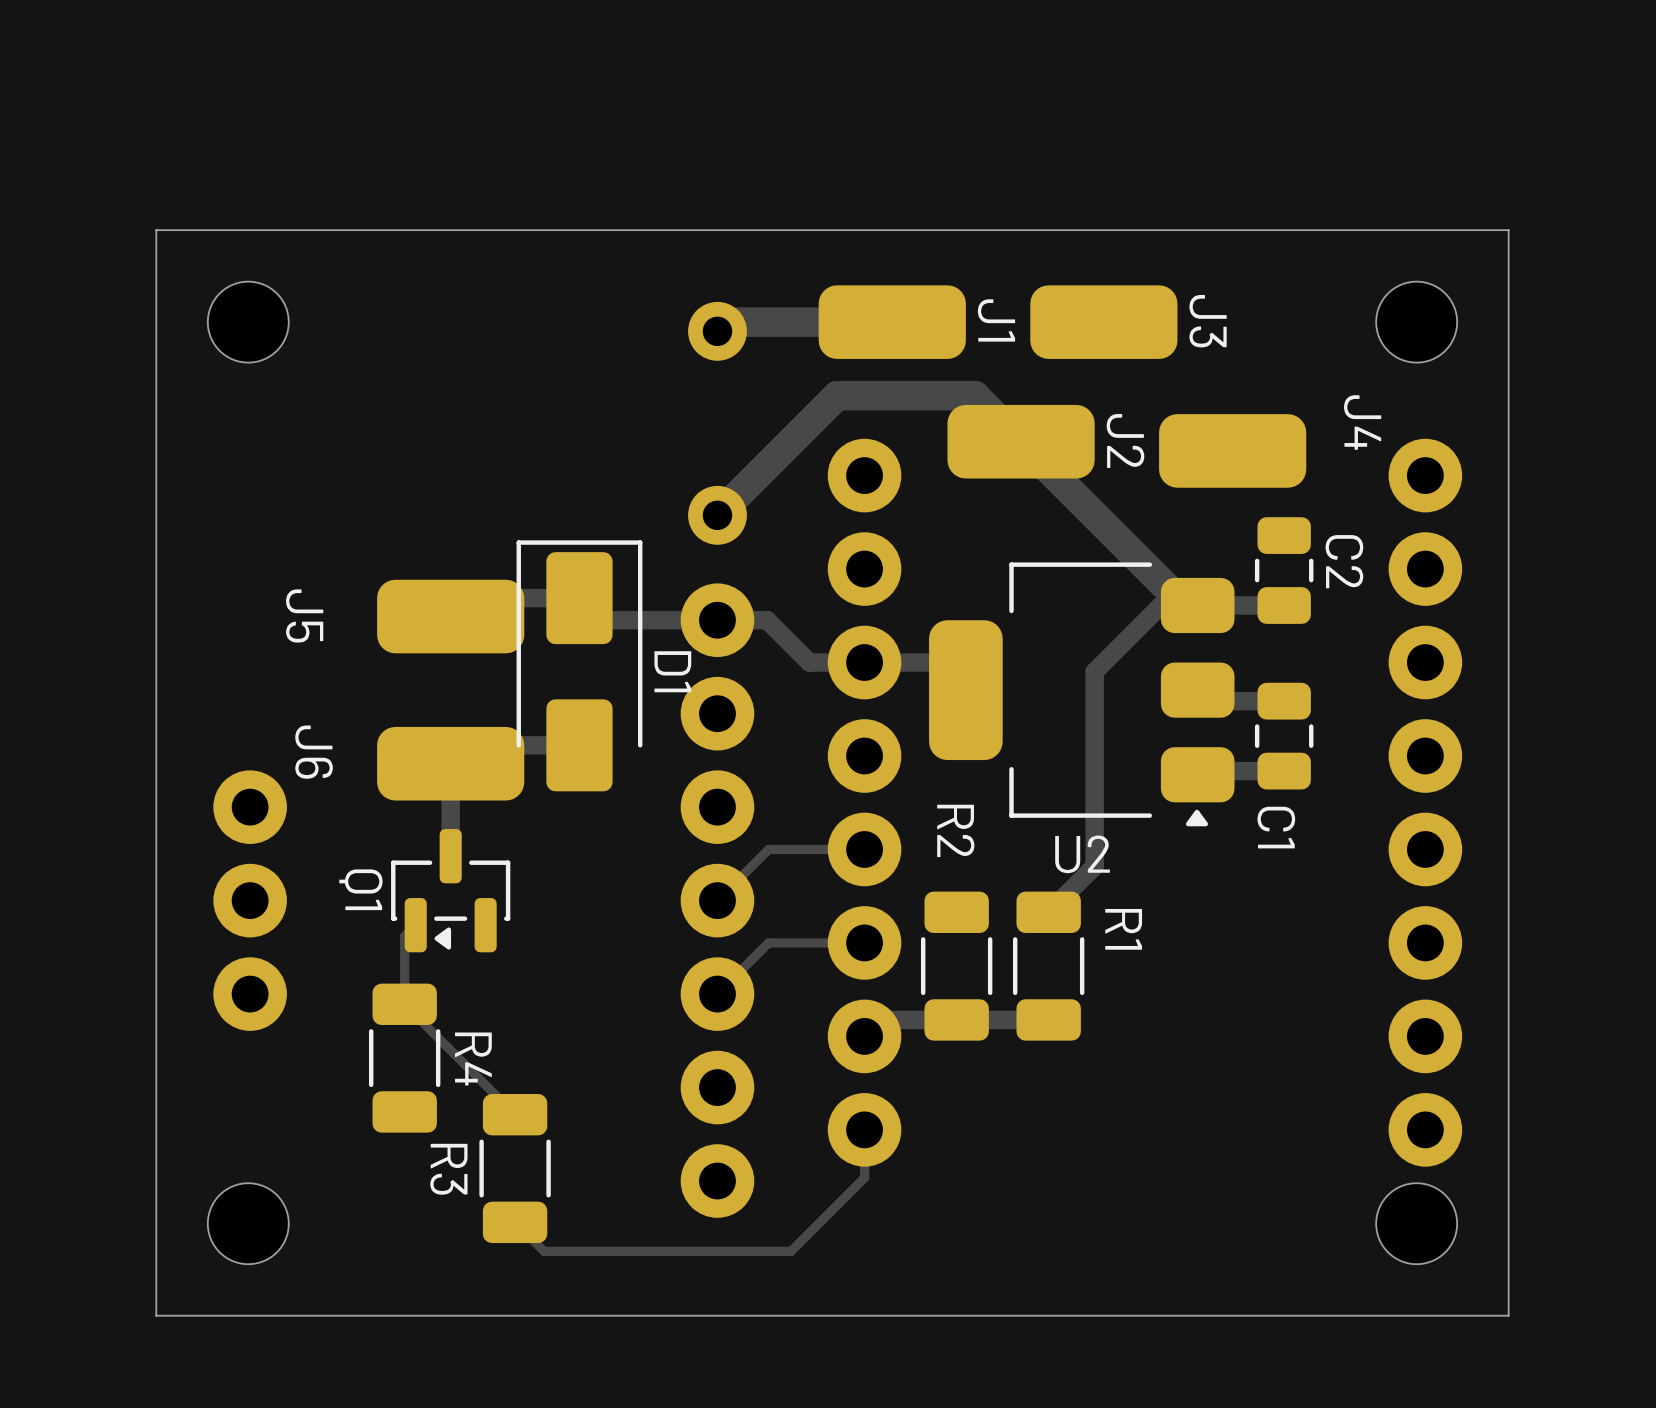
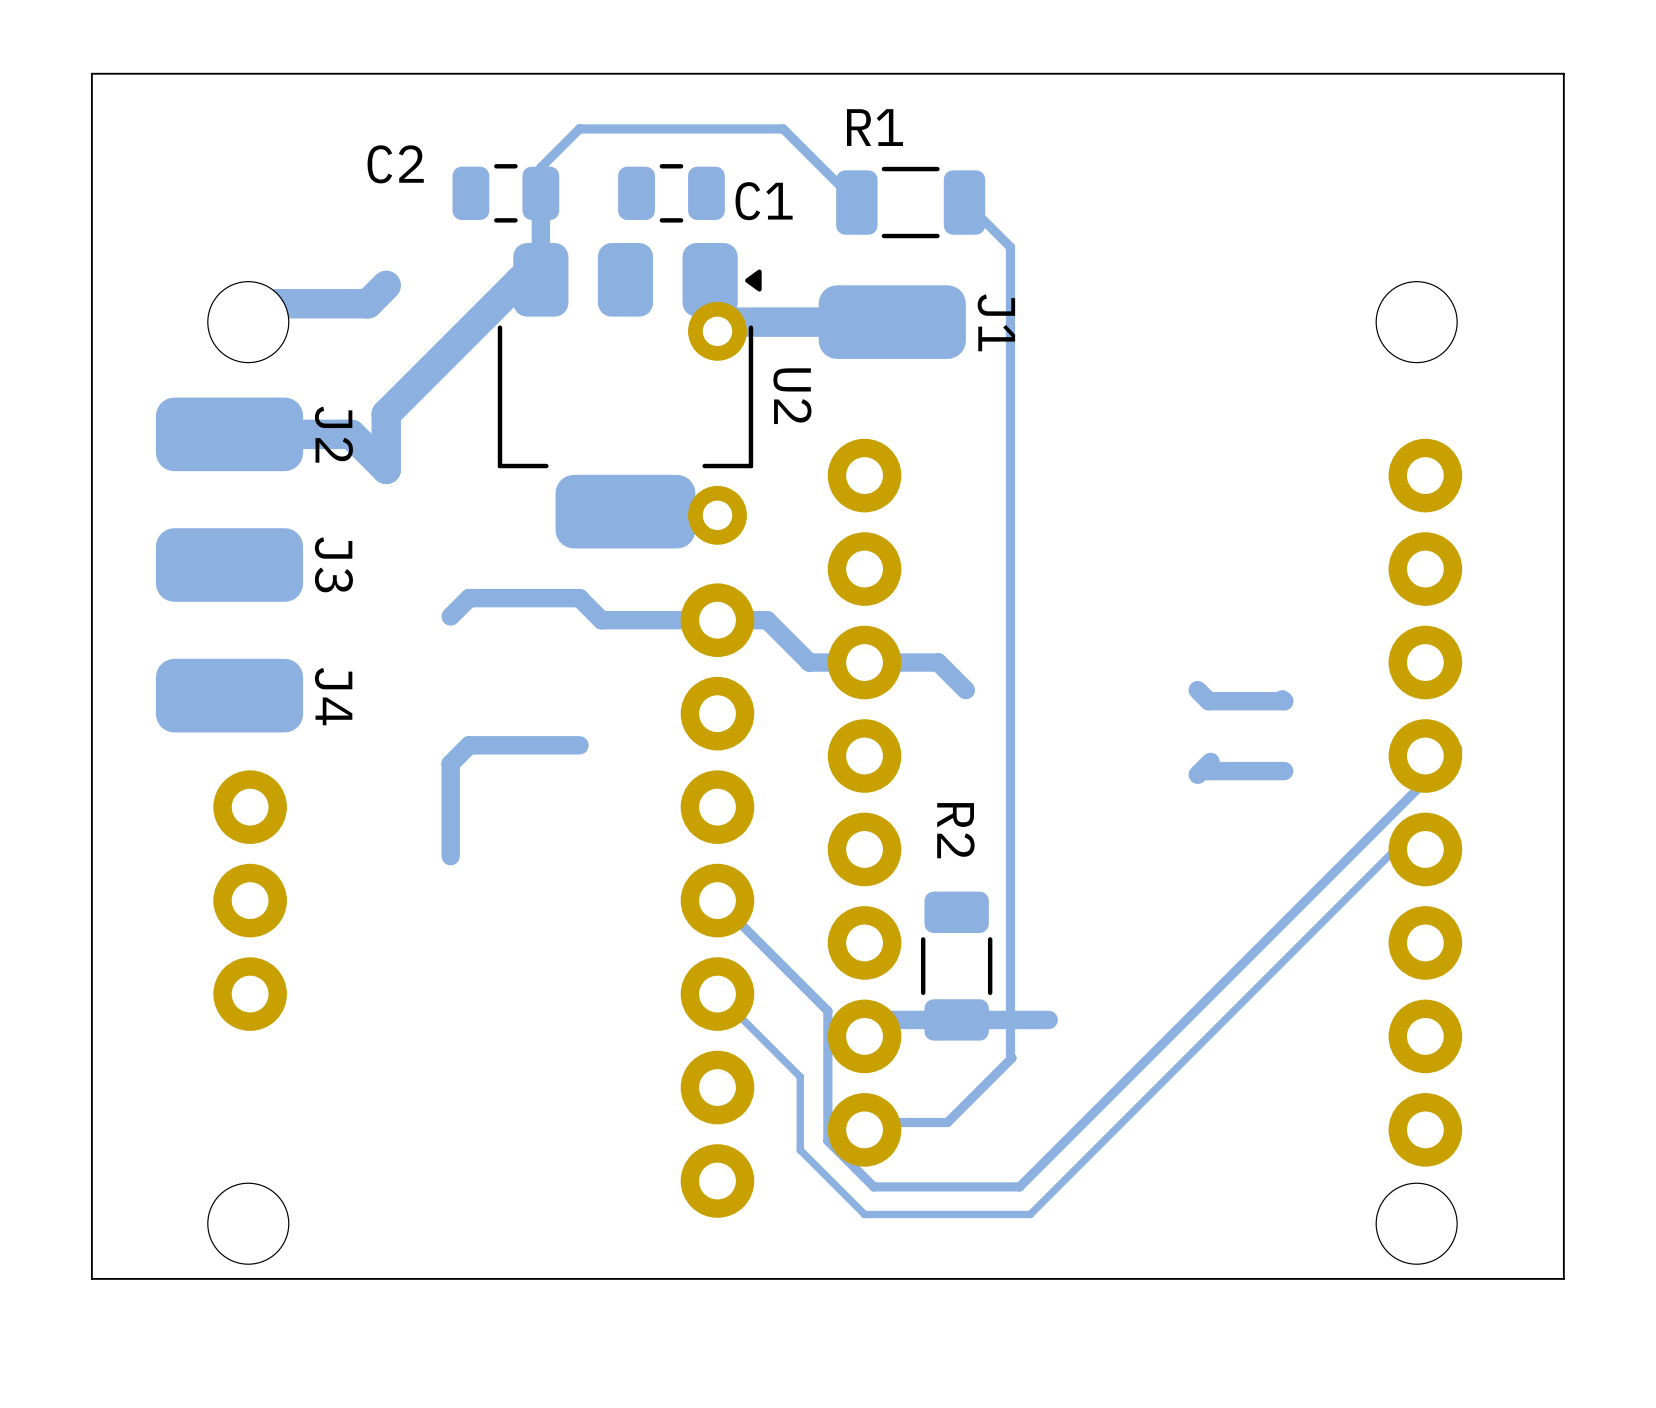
track: none -> (856, 202) (783, 128) (579, 128) (540, 167) (540, 279) (520, 279) (386, 414) (386, 469) (351, 434) (229, 434)
track: none -> (964, 202) (1010, 247) (1011, 1058) (947, 1122) (897, 1122)
board edge: (1508, 230) (156, 230) (156, 1315) (1508, 1315) (1508, 230) -> (1563, 73) (1563, 1278) (91, 1278) (91, 73) (1563, 73)
track: none -> (386, 285) (367, 303) (229, 303)
J3 position: (1103, 322) -> (229, 565)
J4 name position: J4 (1362, 422) -> J4 (333, 696)
J2 position: (1021, 441) -> (229, 434)
J4 position: (1232, 450) -> (229, 695)
track: (717, 515) (837, 395) (975, 395) (1184, 605) -> none
C2 name position: C2 (1344, 561) -> C2 (395, 164)
C2 rotation: 0° (1284, 570) -> 90° clockwise (505, 193)
C2 position: (1284, 570) -> (505, 193)
track: (1284, 605) (1160, 605) (1094, 671) (1094, 866) (1048, 912) -> none
J5: (450, 616) -> none
D1: (579, 665) -> none
U2 rotation: 0° (1081, 694) -> 90° counterclockwise (629, 395)
U2 position: (1081, 694) -> (629, 395)
C1 rotation: 0° (1284, 736) -> 90° clockwise (671, 193)
C1 position: (1284, 736) -> (671, 193)
track: none -> (1457, 748) (1019, 1186) (873, 1186) (827, 1140) (827, 1011) (717, 900) (745, 900)
J6: (450, 763) -> none
C1 name position: C1 (1276, 827) -> C1 (764, 201)
track: (864, 849) (768, 849) (717, 900) -> none
Q1: (450, 890) -> none
track: (415, 925) (404, 936) (404, 1004) (515, 1114) -> none
R1 name position: R1 (1123, 929) -> R1 (875, 127)
track: (864, 942) (768, 942) (717, 994) -> (1457, 842) (1402, 842) (1030, 1214) (864, 1214) (800, 1150) (800, 1076) (717, 994)
R1 rotation: 0° (1048, 966) -> 90° clockwise (910, 202)
R1 position: (1048, 966) -> (910, 202)
R4: (404, 1058) -> none
track: (864, 1130) (864, 1177) (791, 1251) (544, 1251) (515, 1222) -> none
R3: (515, 1168) -> none

